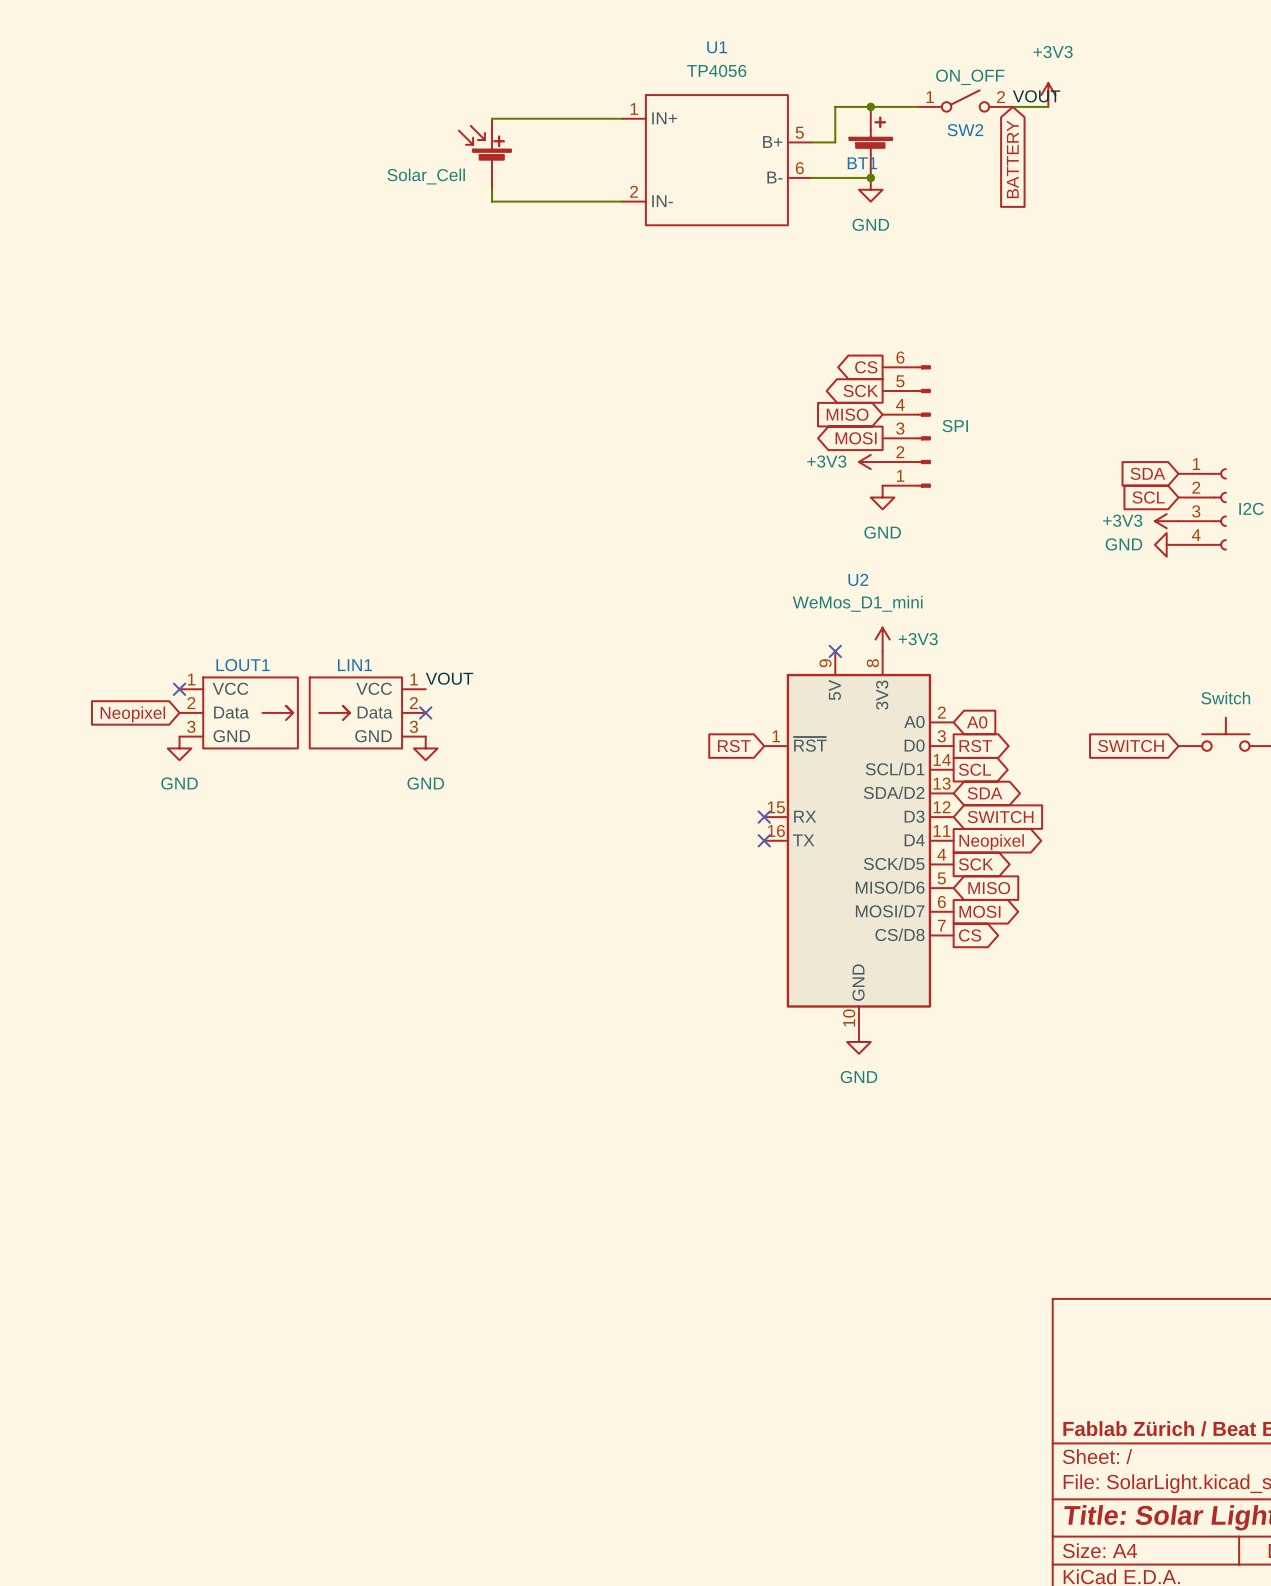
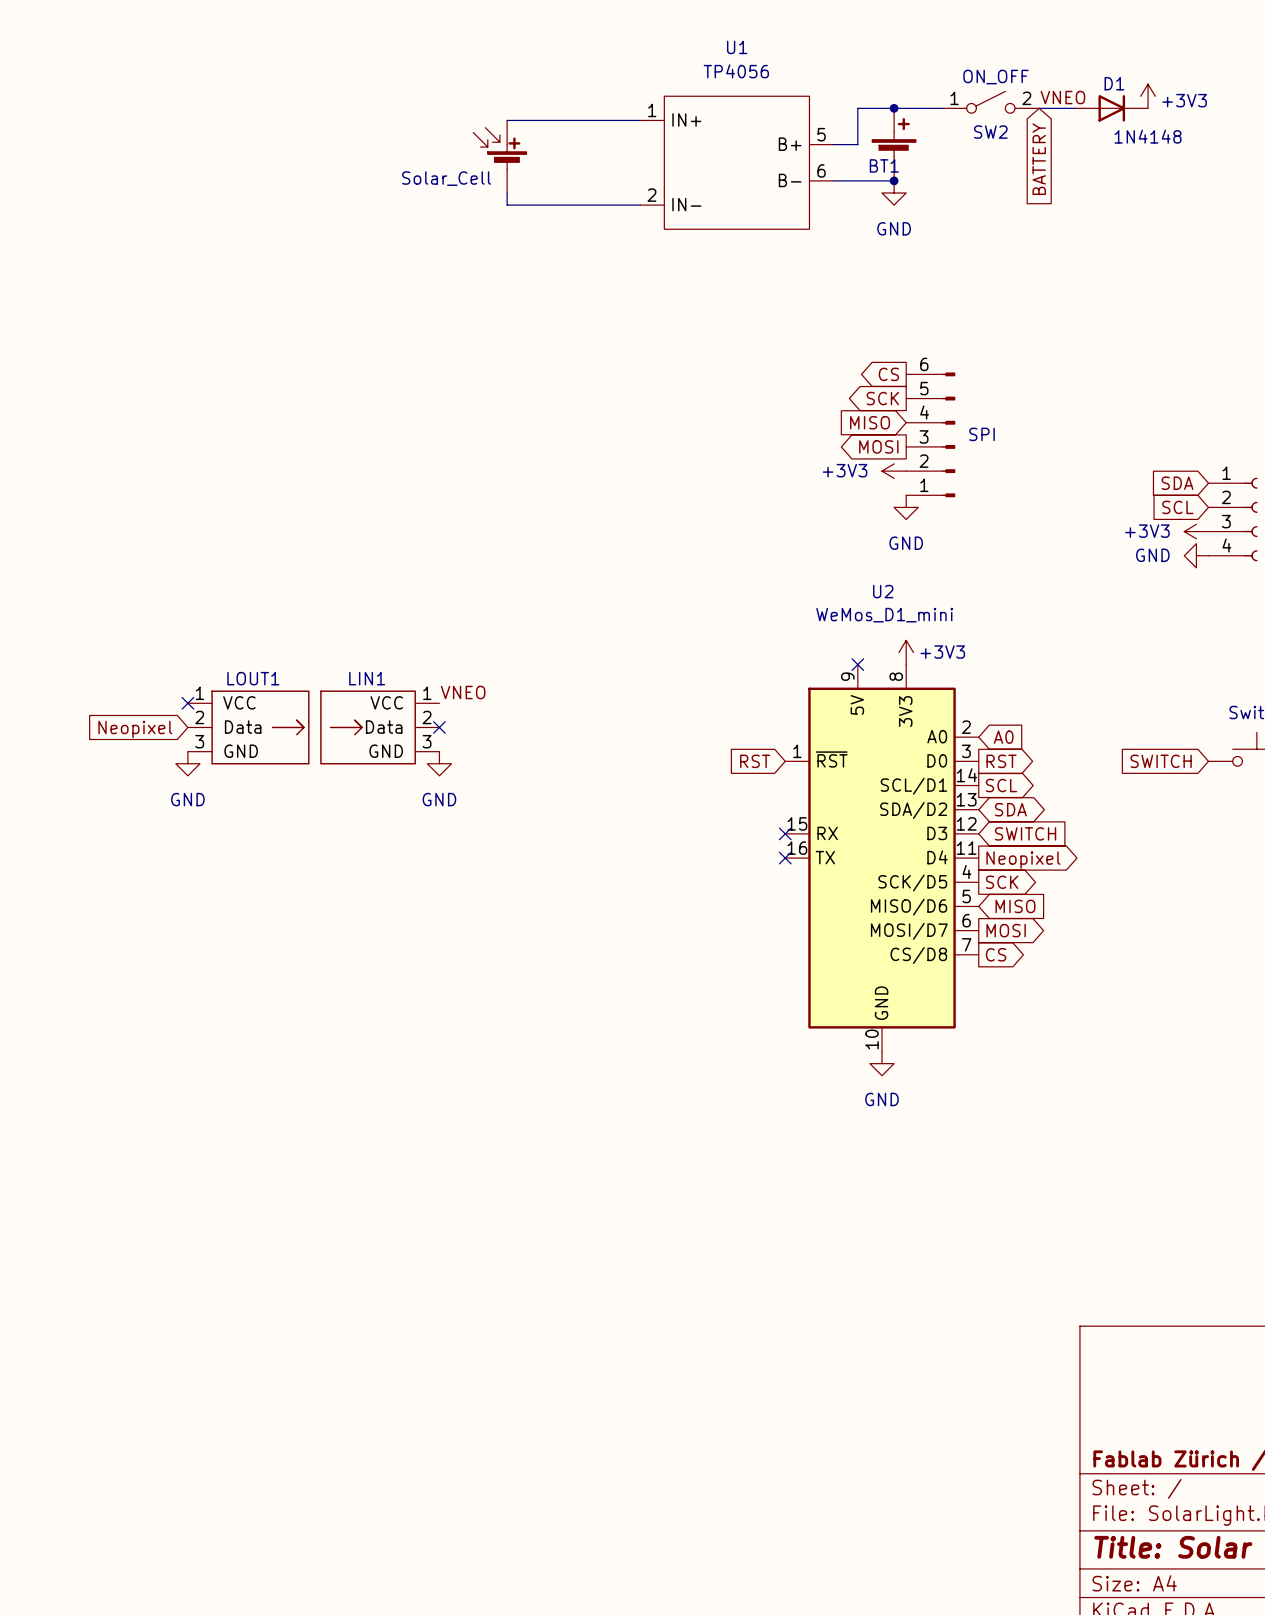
power symbol text position: +3V3 (1053, 52) -> +3V3 (1184, 100)
power symbol position: +3V3 (1048, 95) -> +3V3 (1148, 96)
label: VOUT (1036, 96) -> VNEO (1062, 97)
D1: none -> 1N4148 (1111, 108)
label: VOUT (449, 678) -> VNEO (463, 692)

